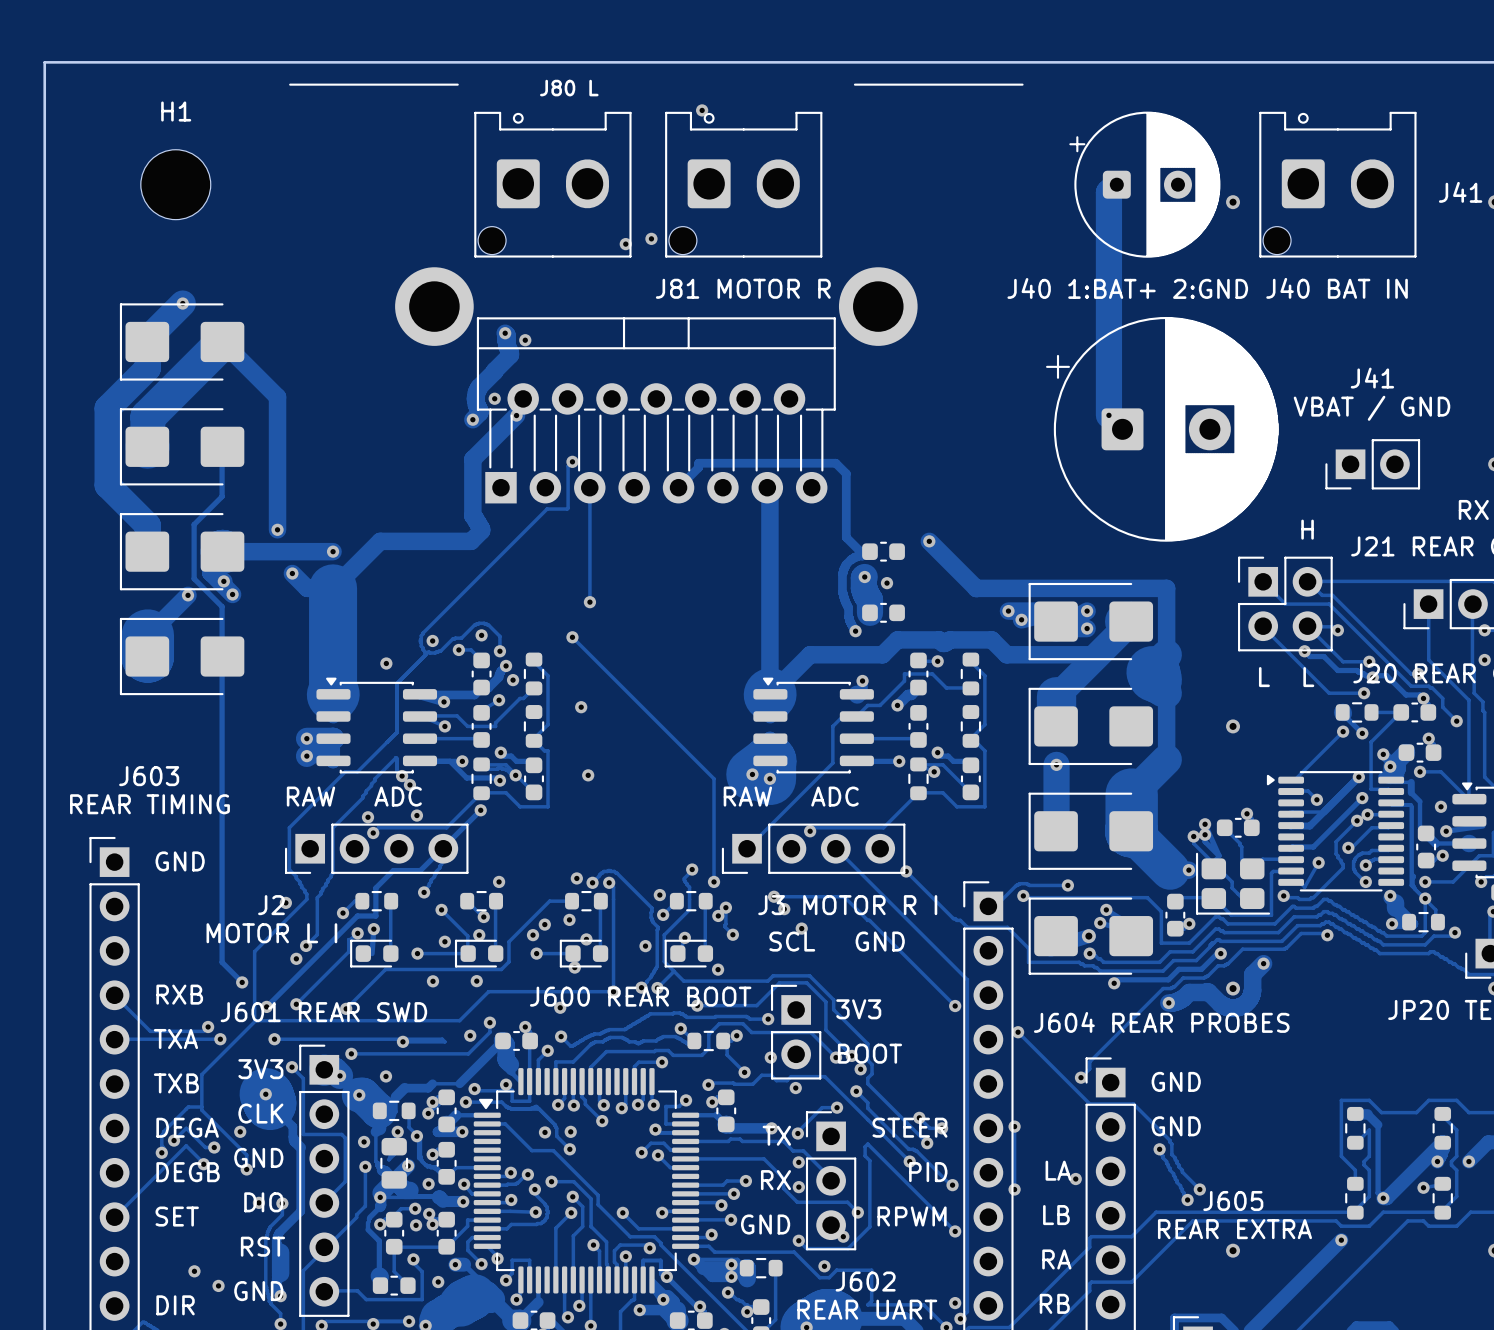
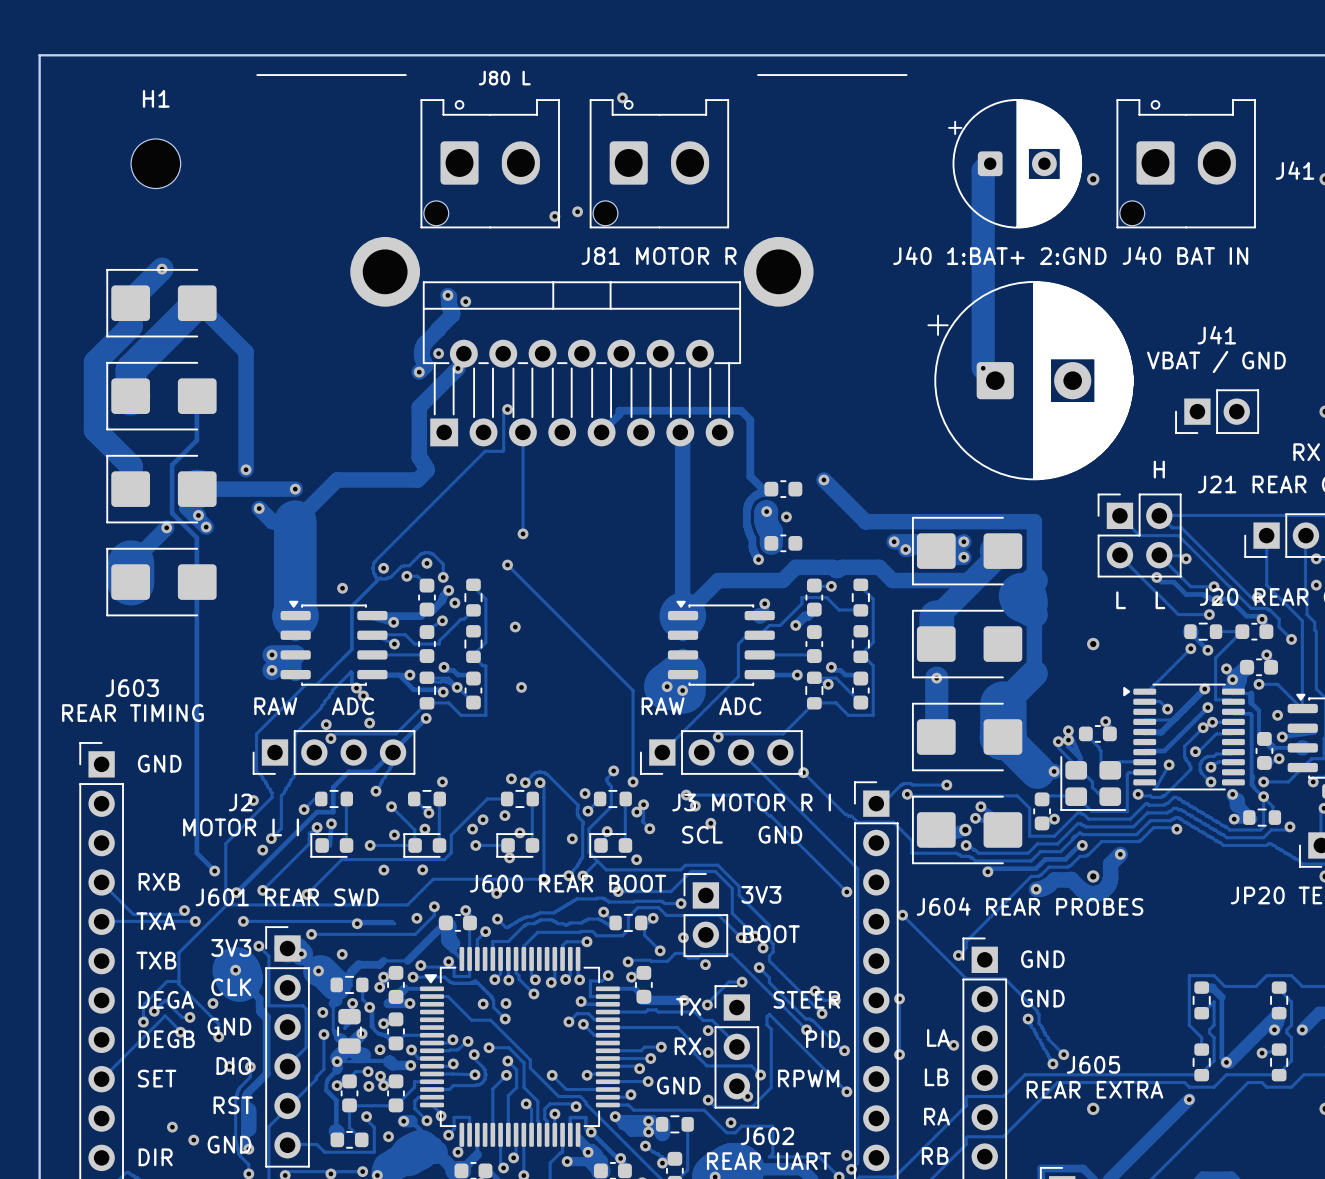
H1 footprint: [140, 149, 211, 220] -> [131, 138, 181, 189]

